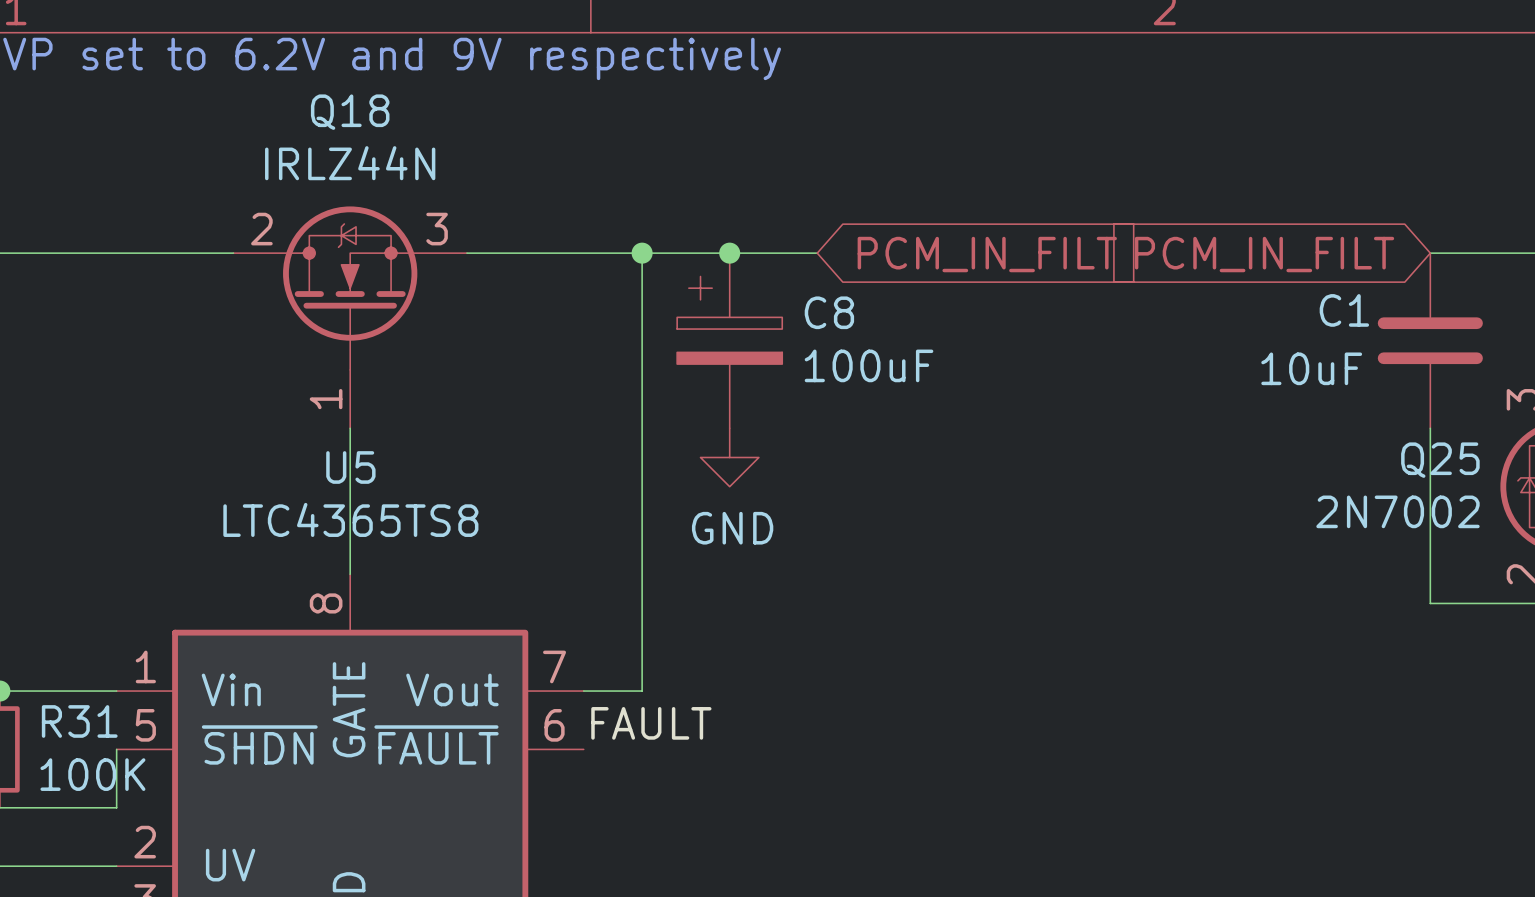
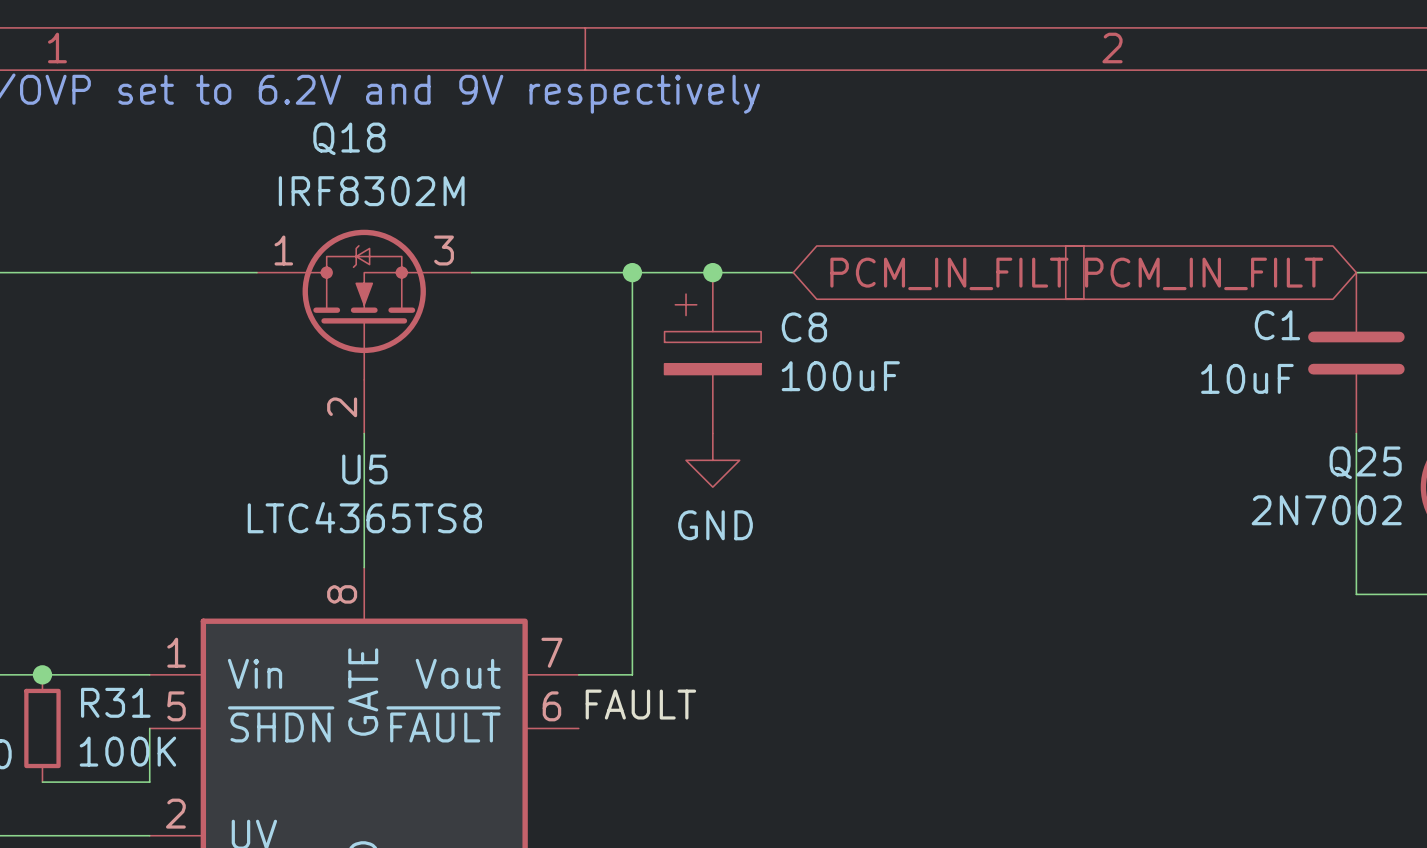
Q18 name position: Q18 (350, 112) -> Q18 (349, 138)
Q18 value: IRLZ44N (350, 163) -> IRF8302M (371, 191)
Q18 pin number: 2 (261, 229) -> 1 (283, 250)
Q18 pin number: 1 (326, 399) -> 2 (342, 407)

